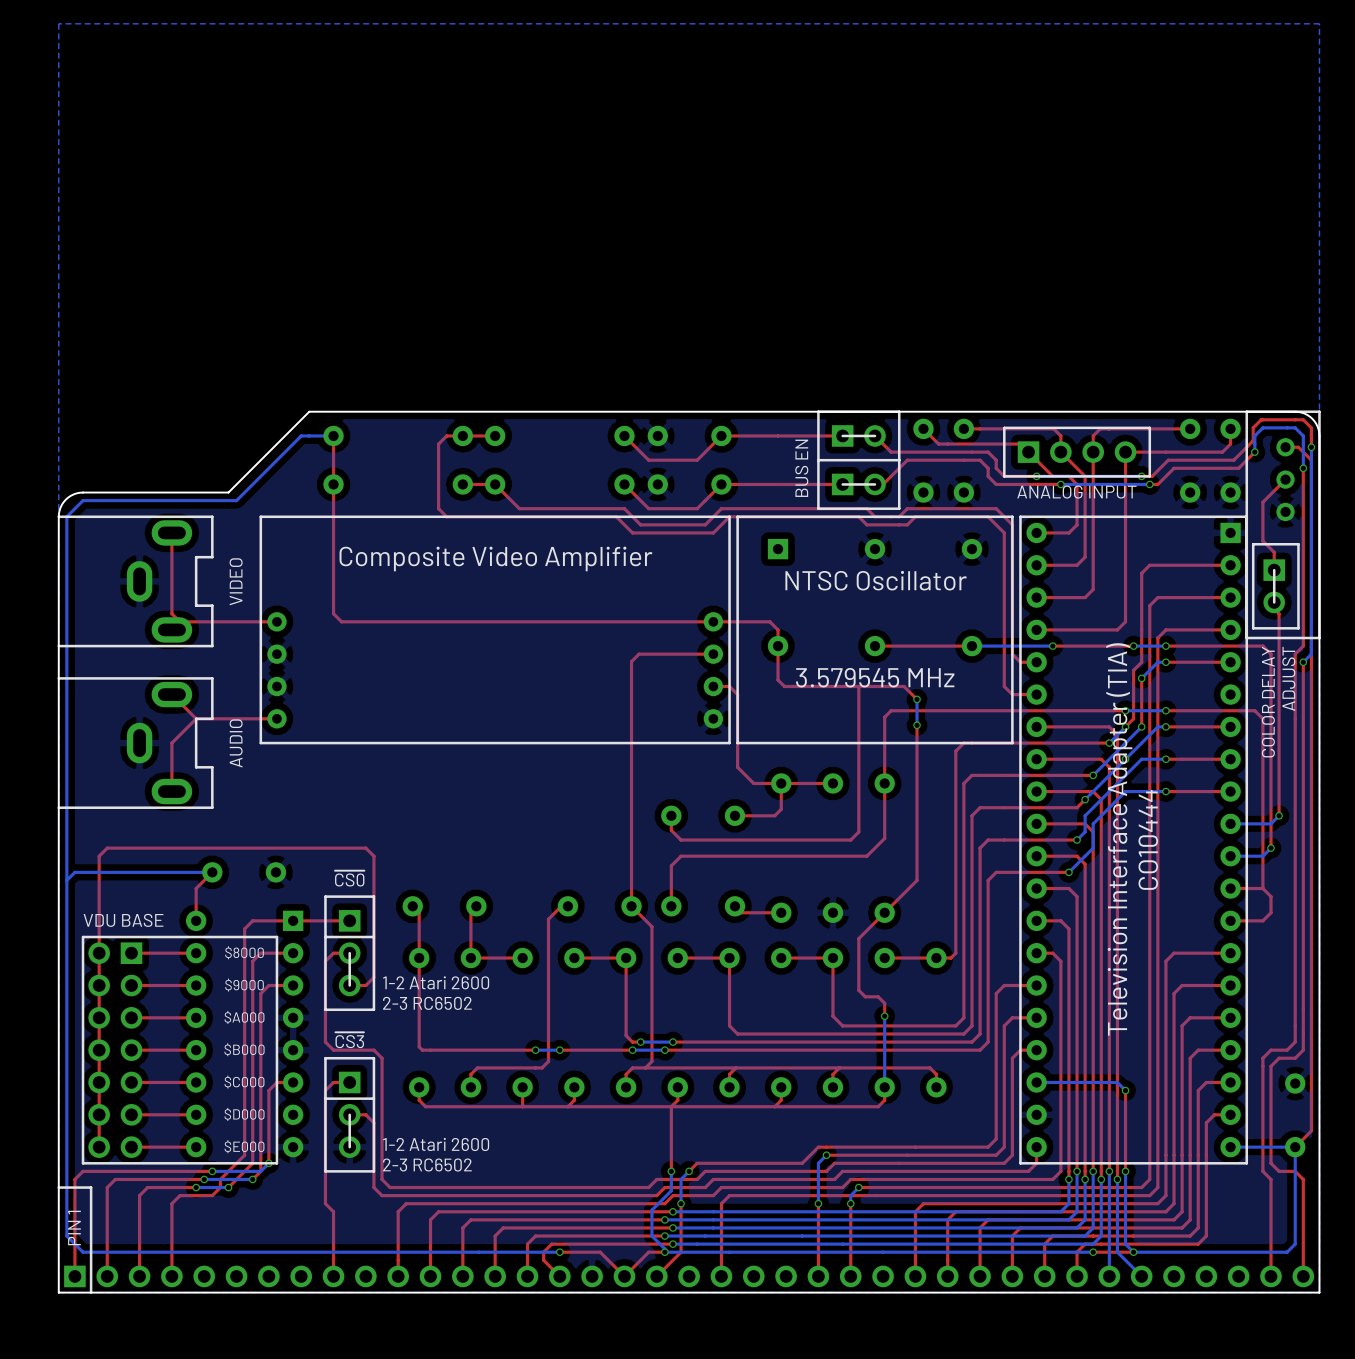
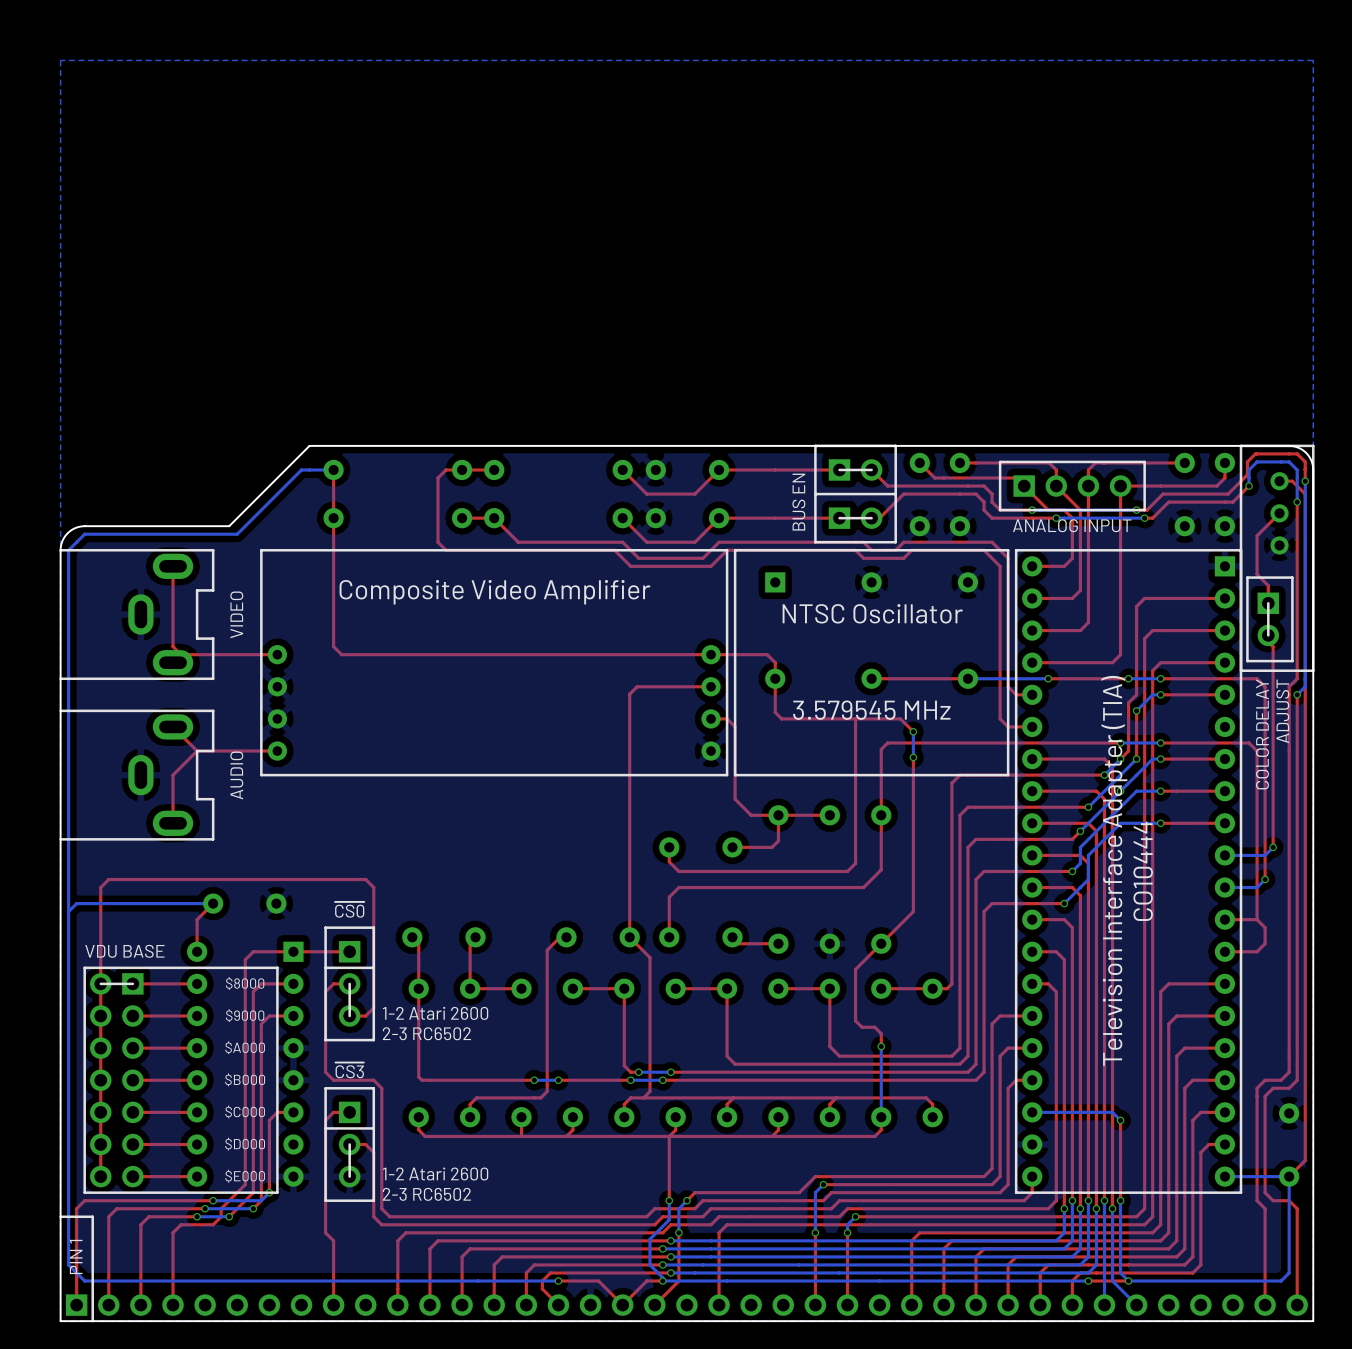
line: none -> (132, 983) (100, 983)

